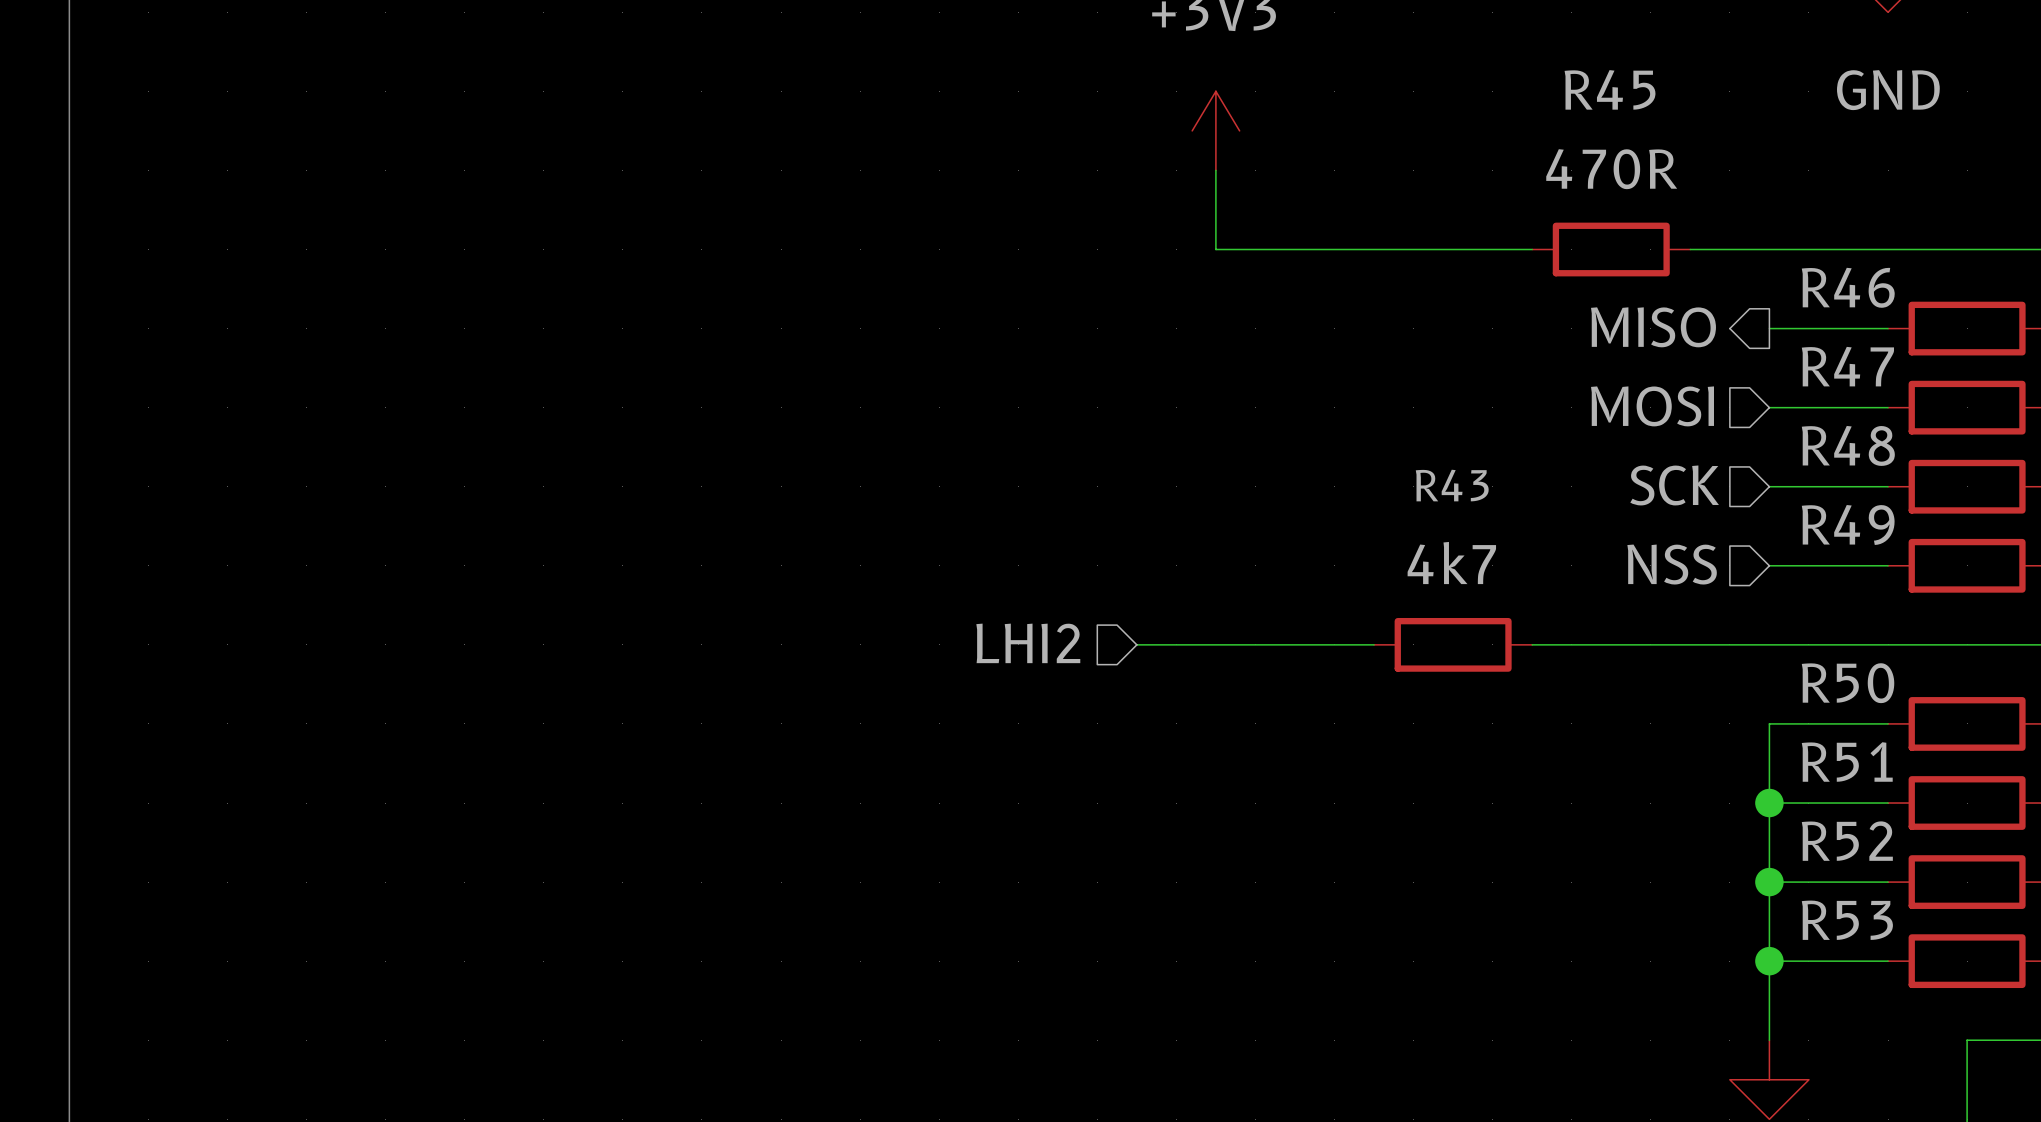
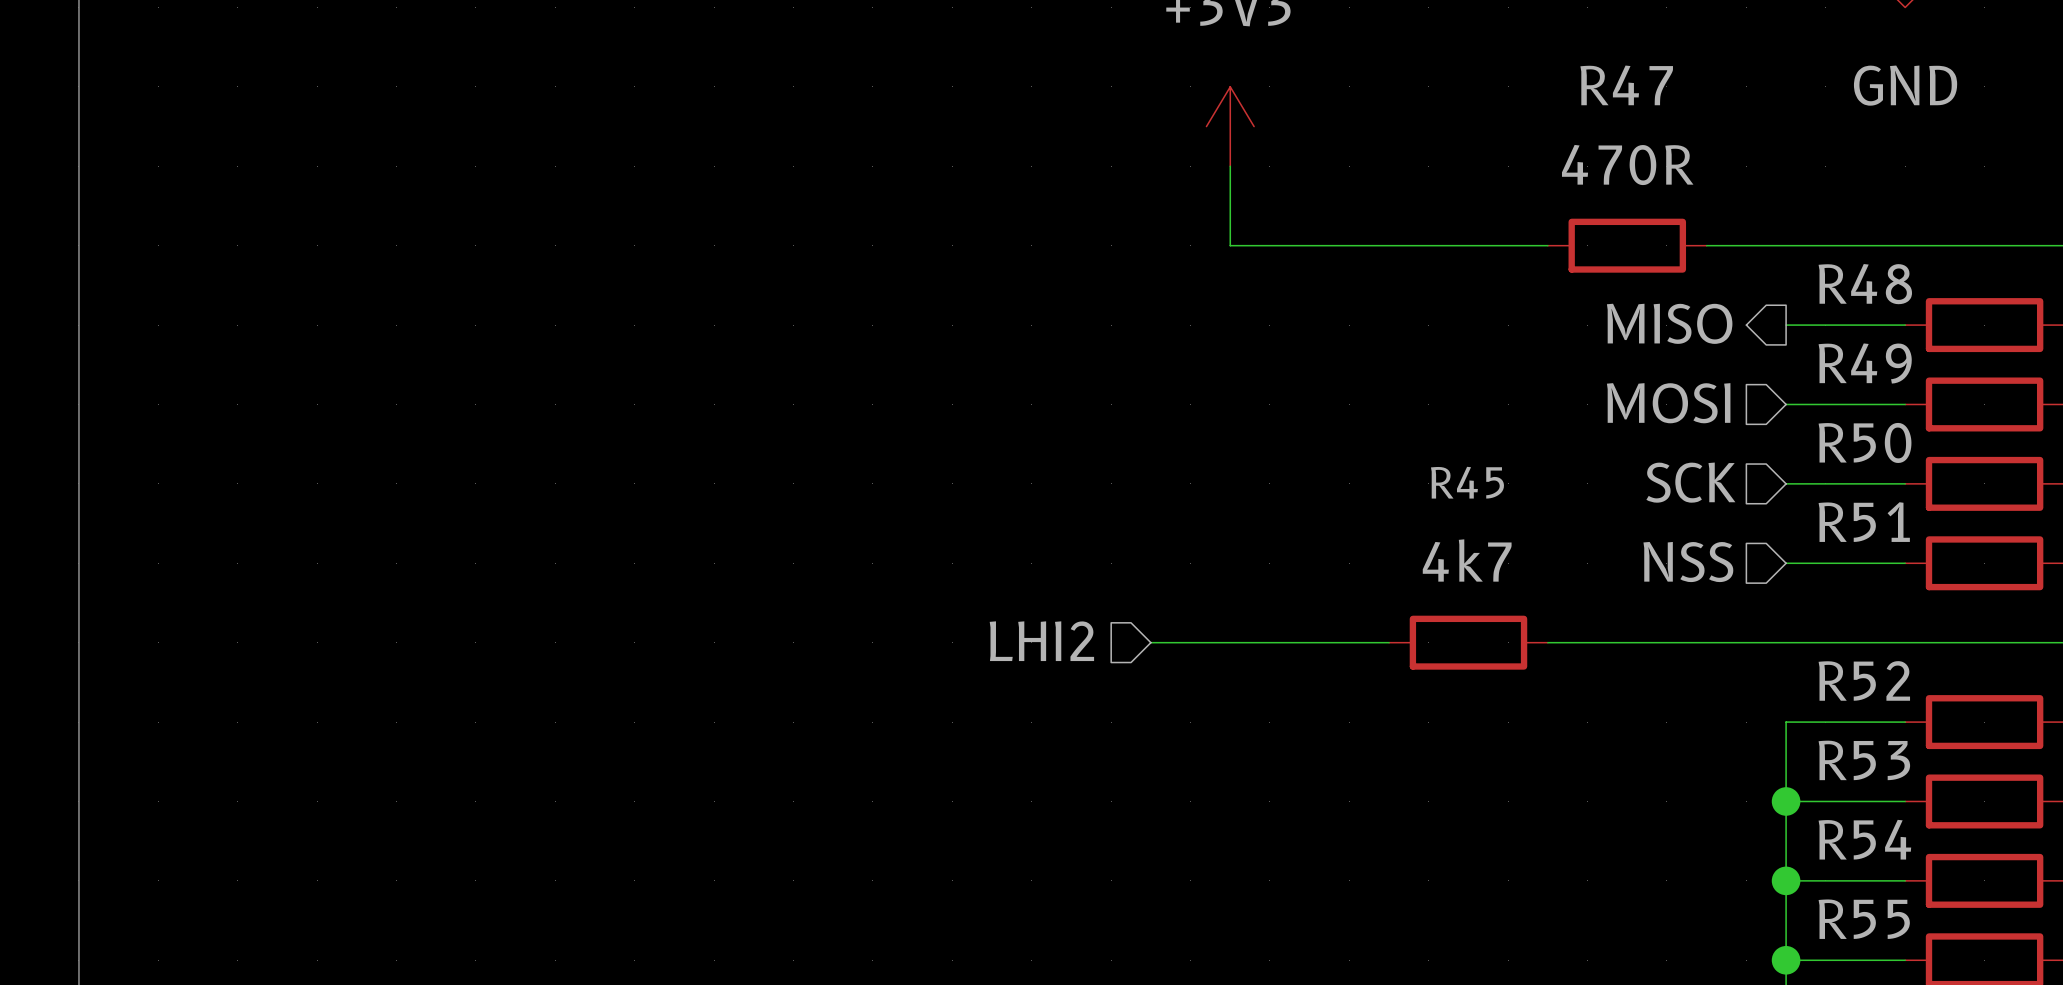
R45 name: R45 (1610, 89) -> R47 (1626, 85)
R46 name: R46 (1848, 287) -> R48 (1865, 284)
R47 name: R47 (1847, 366) -> R49 (1865, 363)
R48 name: R48 (1848, 445) -> R50 (1865, 442)
R43 name: R43 (1452, 485) -> R45 (1467, 482)
R49 name: R49 (1848, 525) -> R51 (1864, 522)
R50 name: R50 (1848, 683) -> R52 (1864, 680)
R51 name: R51 (1847, 761) -> R53 (1864, 760)
R52 name: R52 (1847, 841) -> R54 (1864, 839)
R53 name: R53 (1847, 920) -> R55 (1864, 919)

